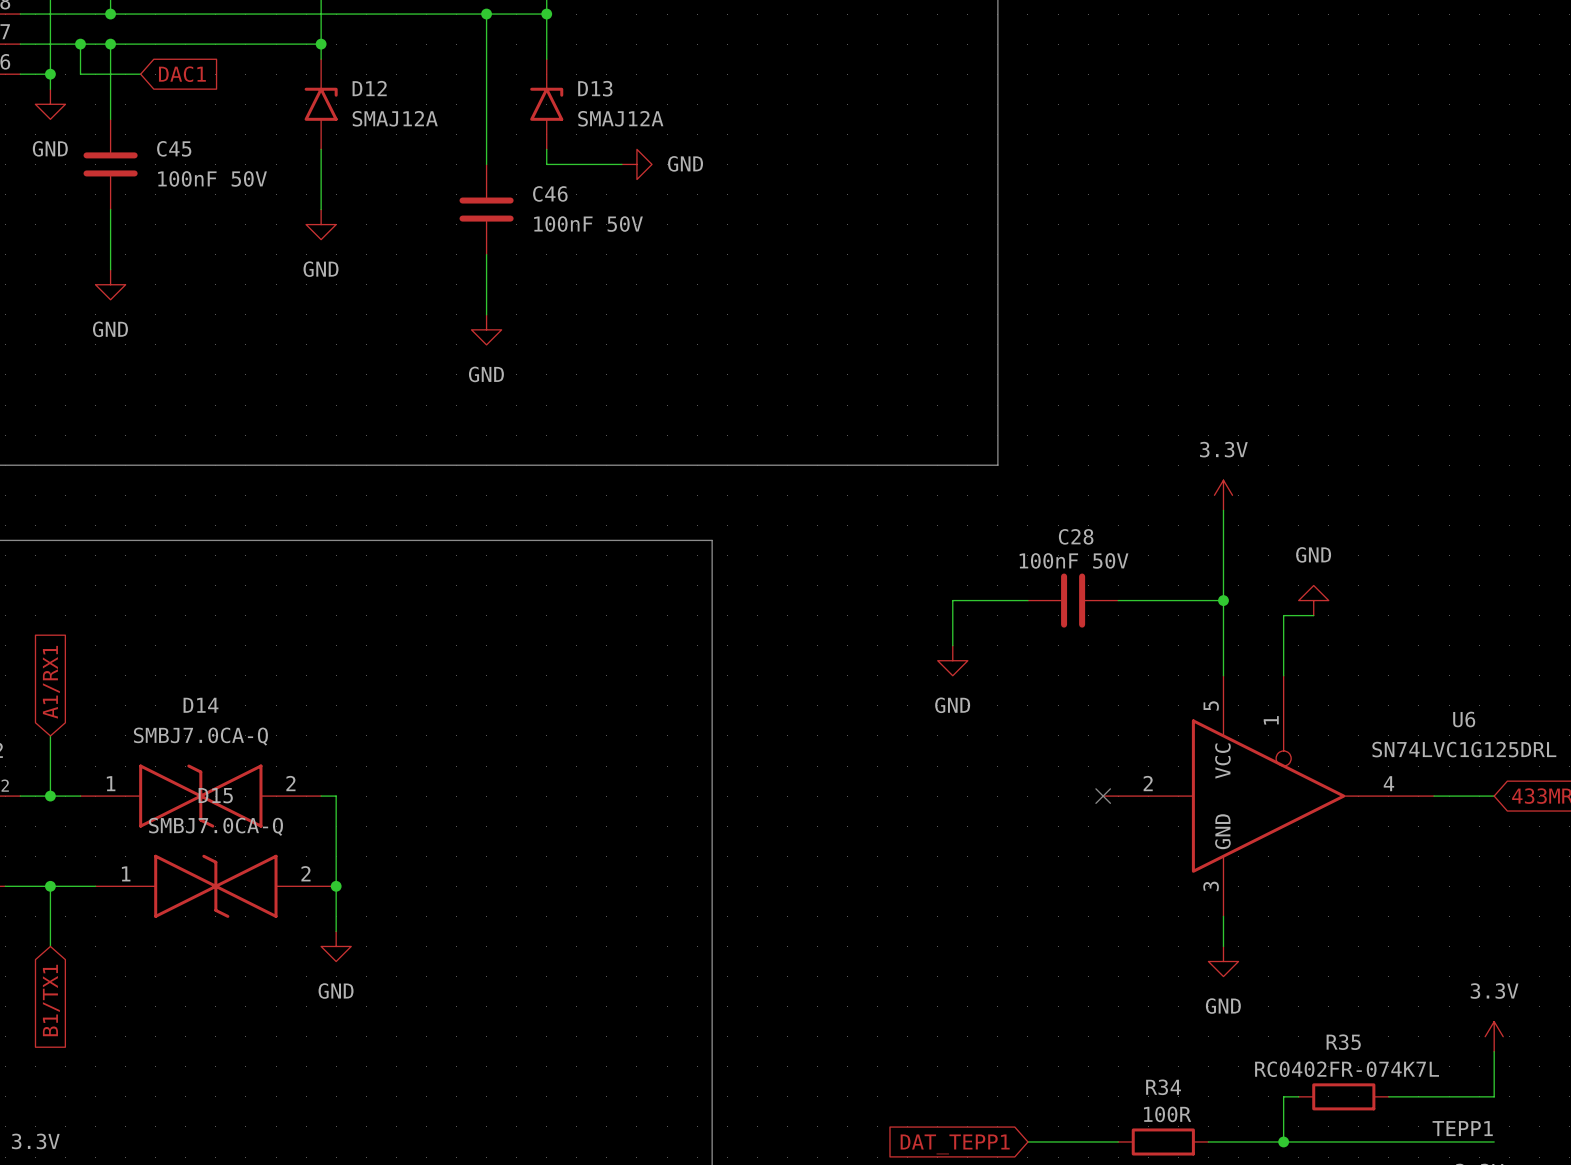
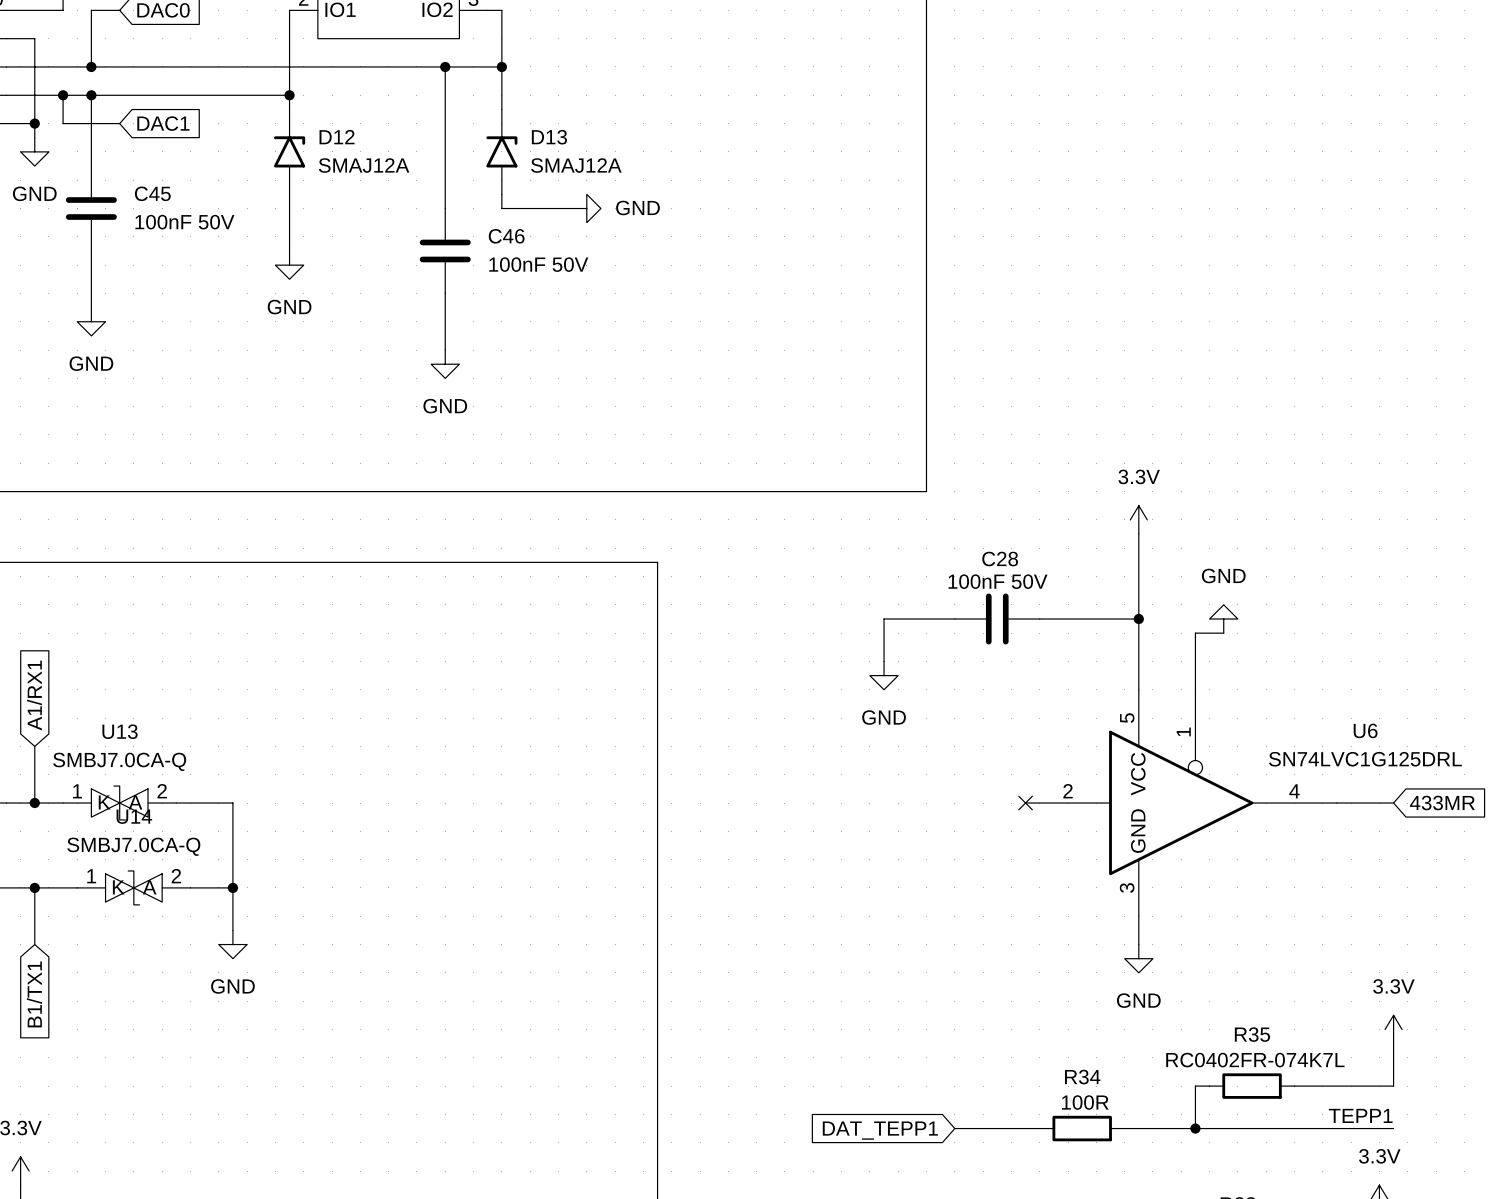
U13: none -> SMBJ7.0CA-Q (119, 803)
wire: none -> (176, 803) (232, 803) (232, 930)
D14: SMBJ7.0CA-Q (200, 796) -> none
wire: (321, 796) (336, 796) (336, 931) -> none
U14: none -> SMBJ7.0CA-Q (133, 887)
wire: none -> (190, 887) (232, 887)
D15: SMBJ7.0CA-Q (215, 886) -> none
junction: none -> (232, 887)
junction: (336, 886) -> none
power symbol position: GND (336, 946) -> GND (232, 944)

